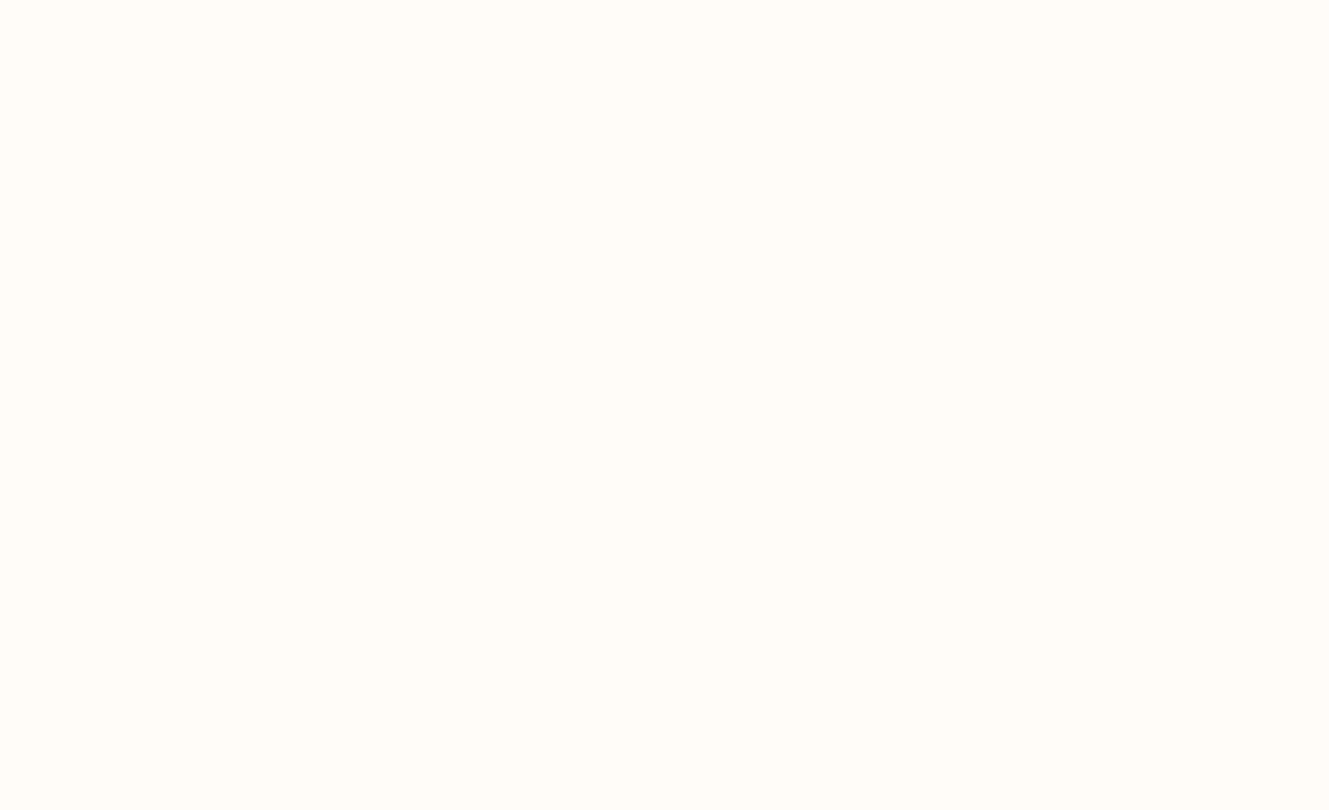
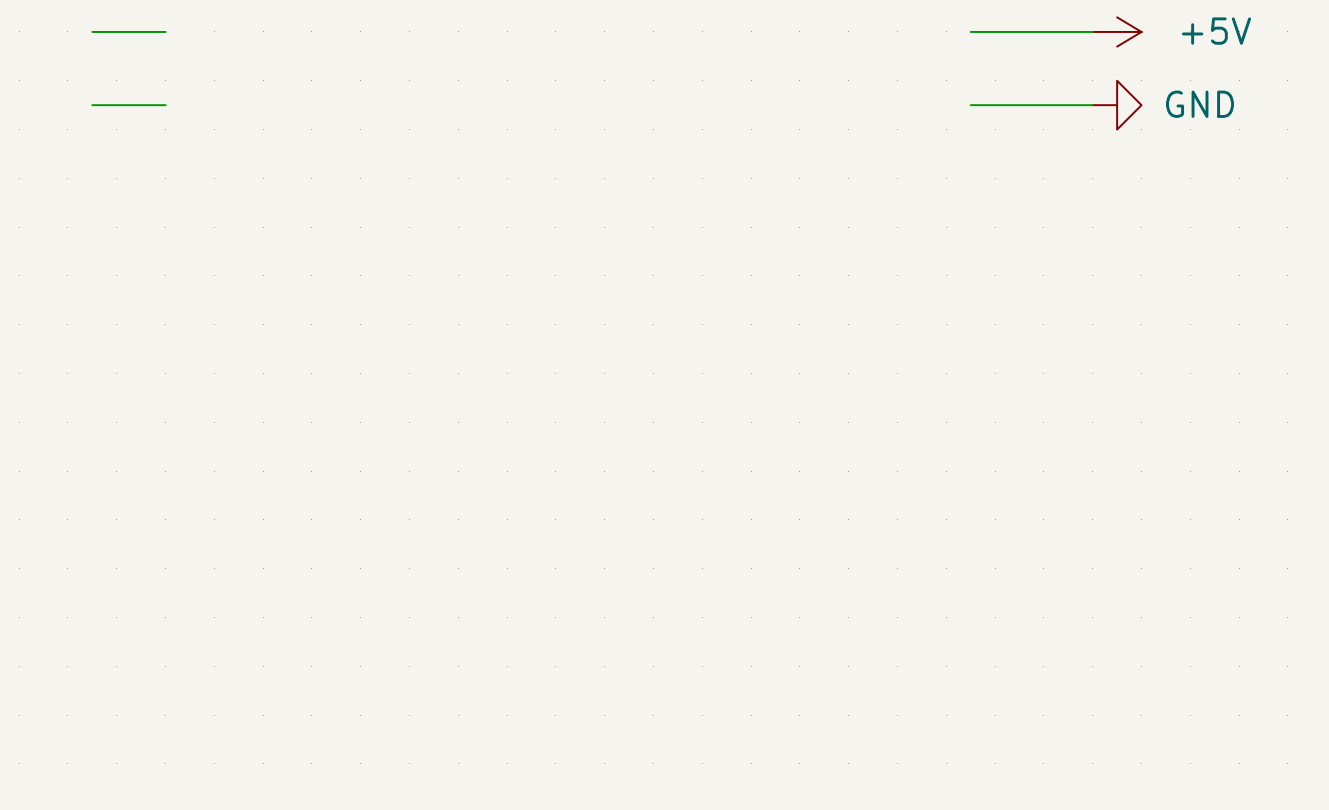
wire: none -> (92, 31) (165, 31)
wire: none -> (970, 31) (1092, 31)
power symbol: none -> +5V (1117, 31)
wire: none -> (92, 105) (165, 105)
wire: none -> (970, 105) (1092, 105)
power symbol: none -> GND (1117, 105)

